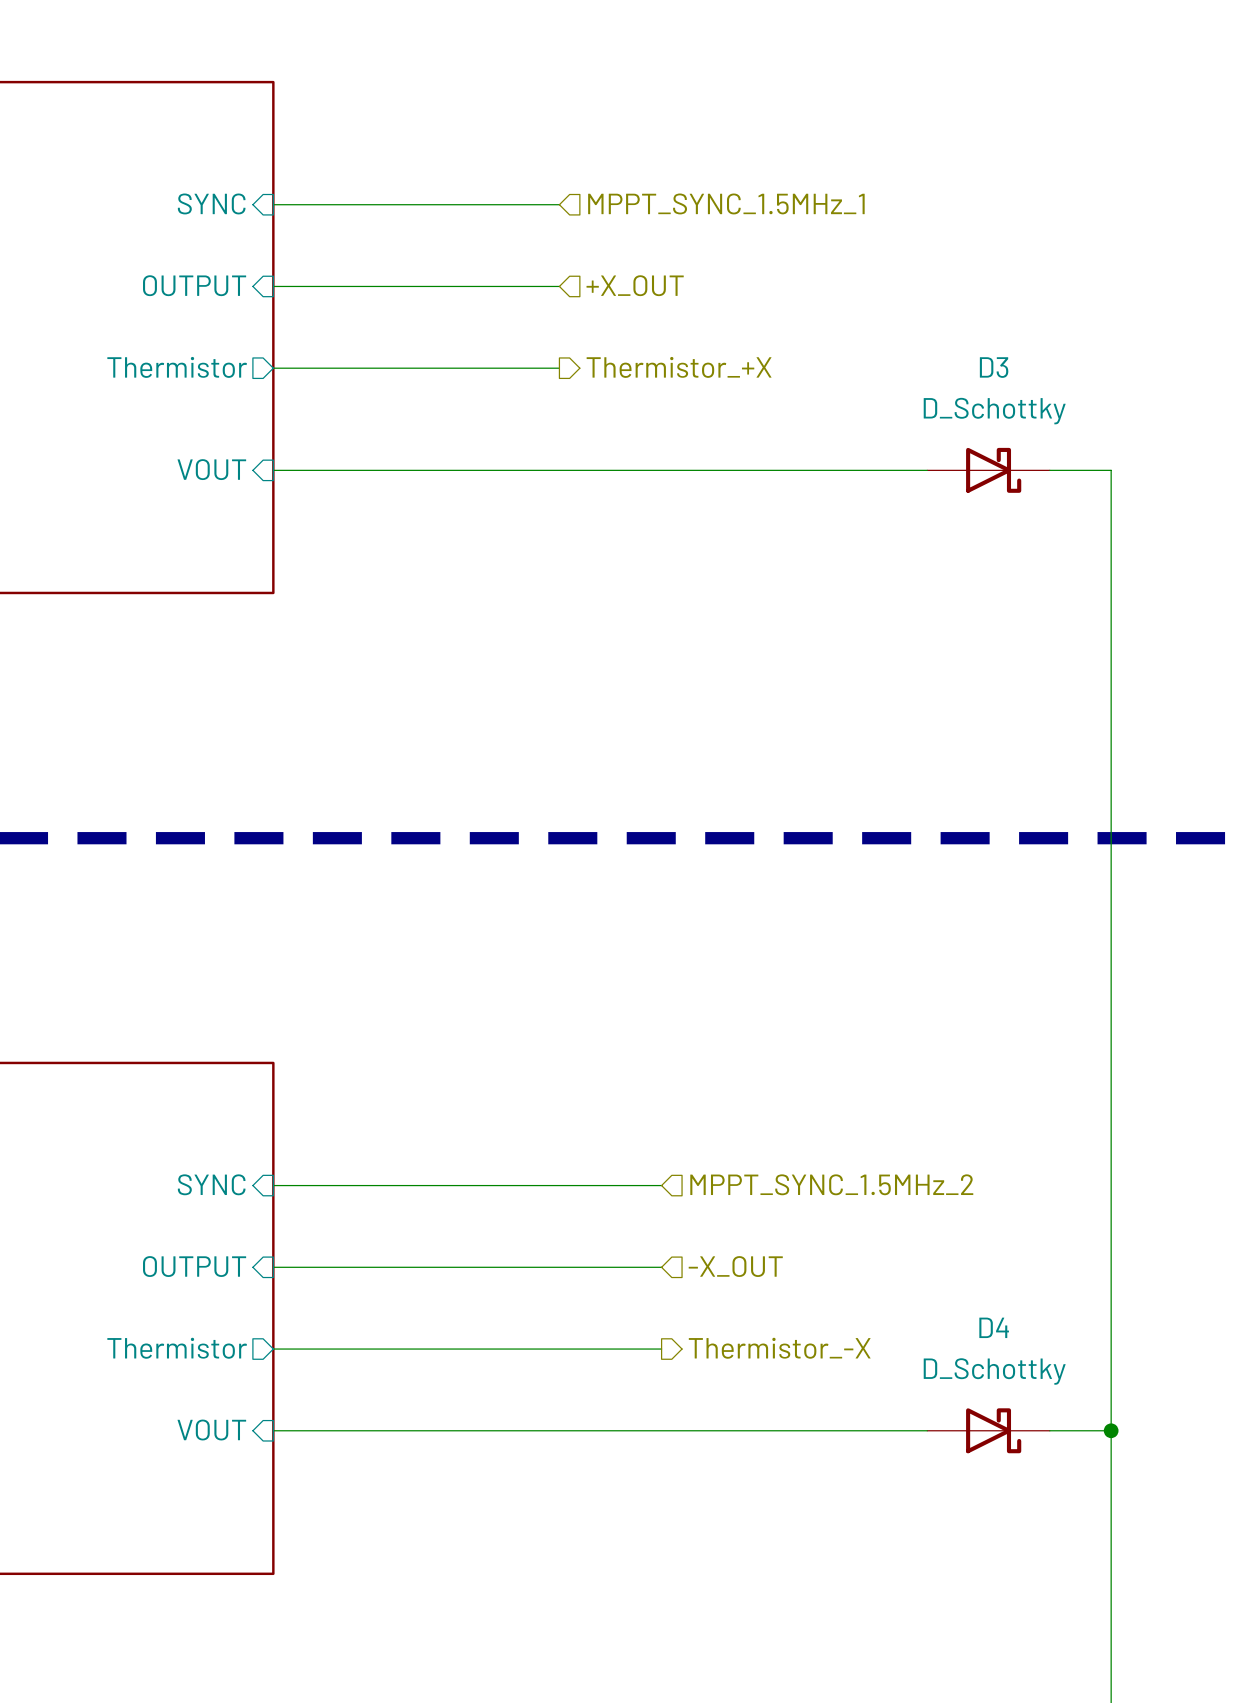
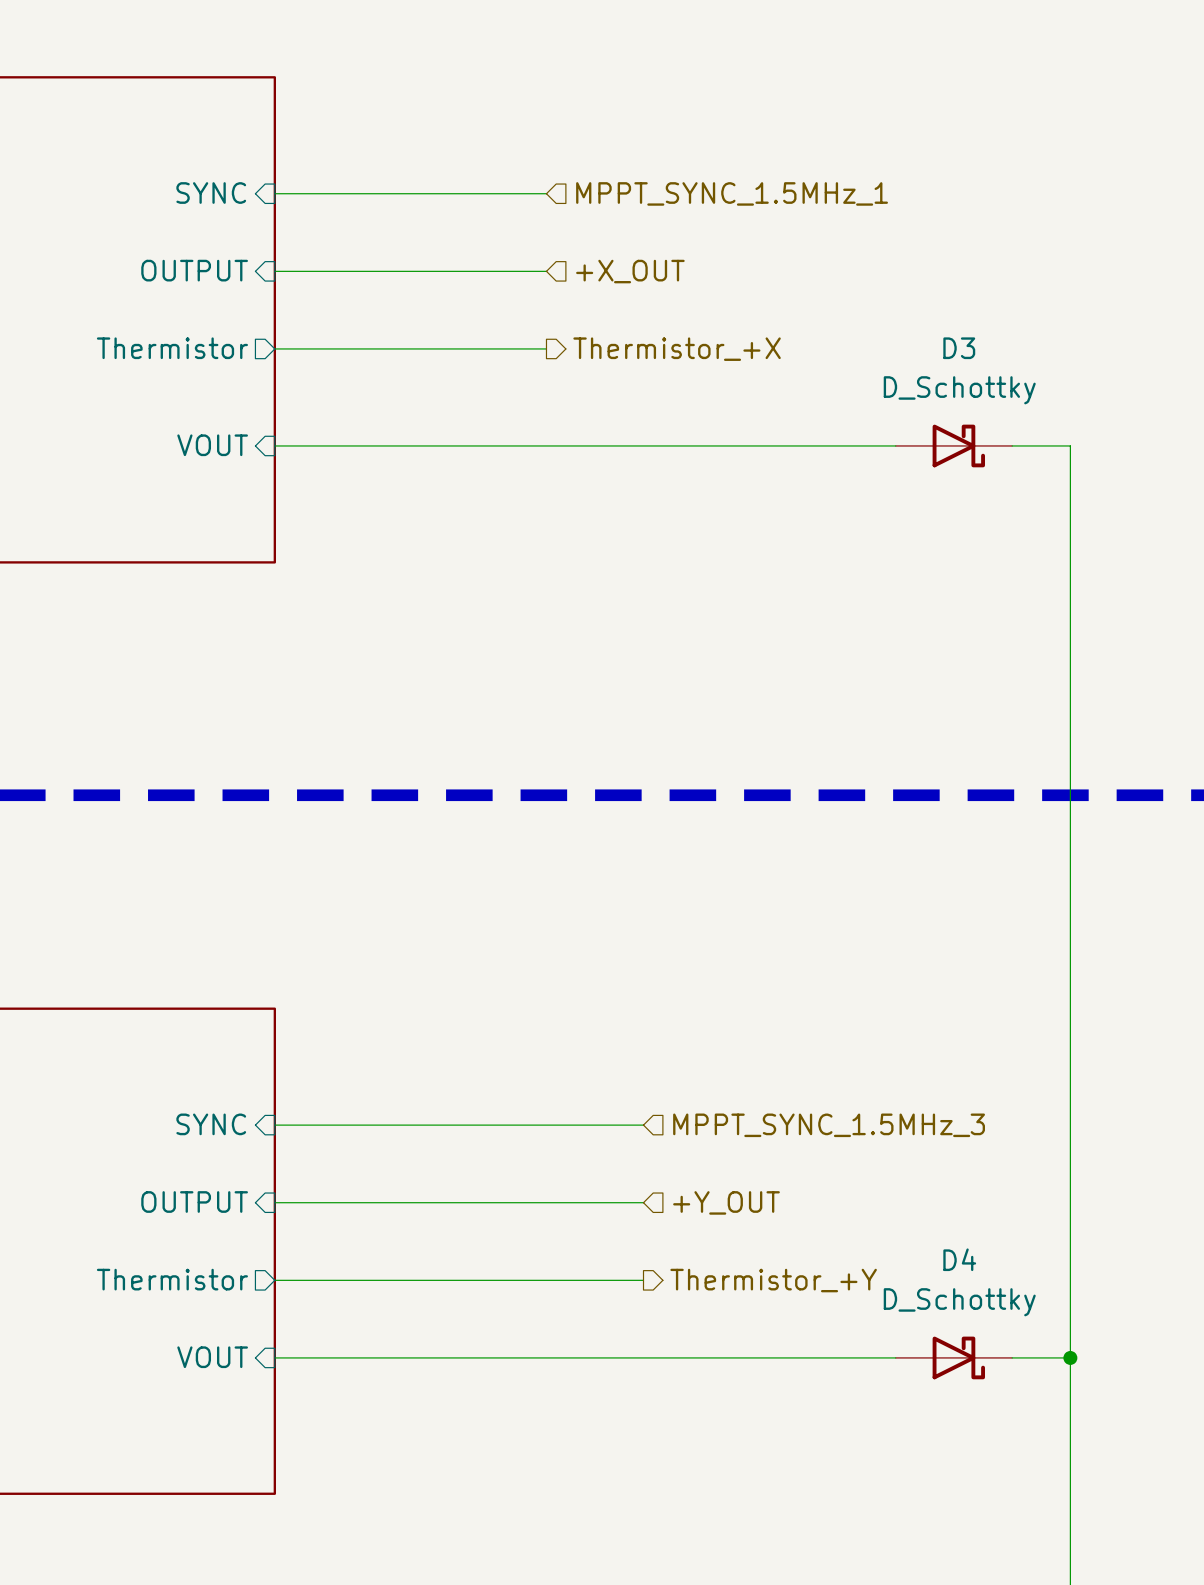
hierarchical label: MPPT_SYNC_1.5MHz_2 (831, 1184) -> MPPT_SYNC_1.5MHz_3 (829, 1125)
hierarchical label: -X_OUT (735, 1266) -> +Y_OUT (726, 1202)
hierarchical label: Thermistor_-X (779, 1348) -> Thermistor_+Y (773, 1280)

